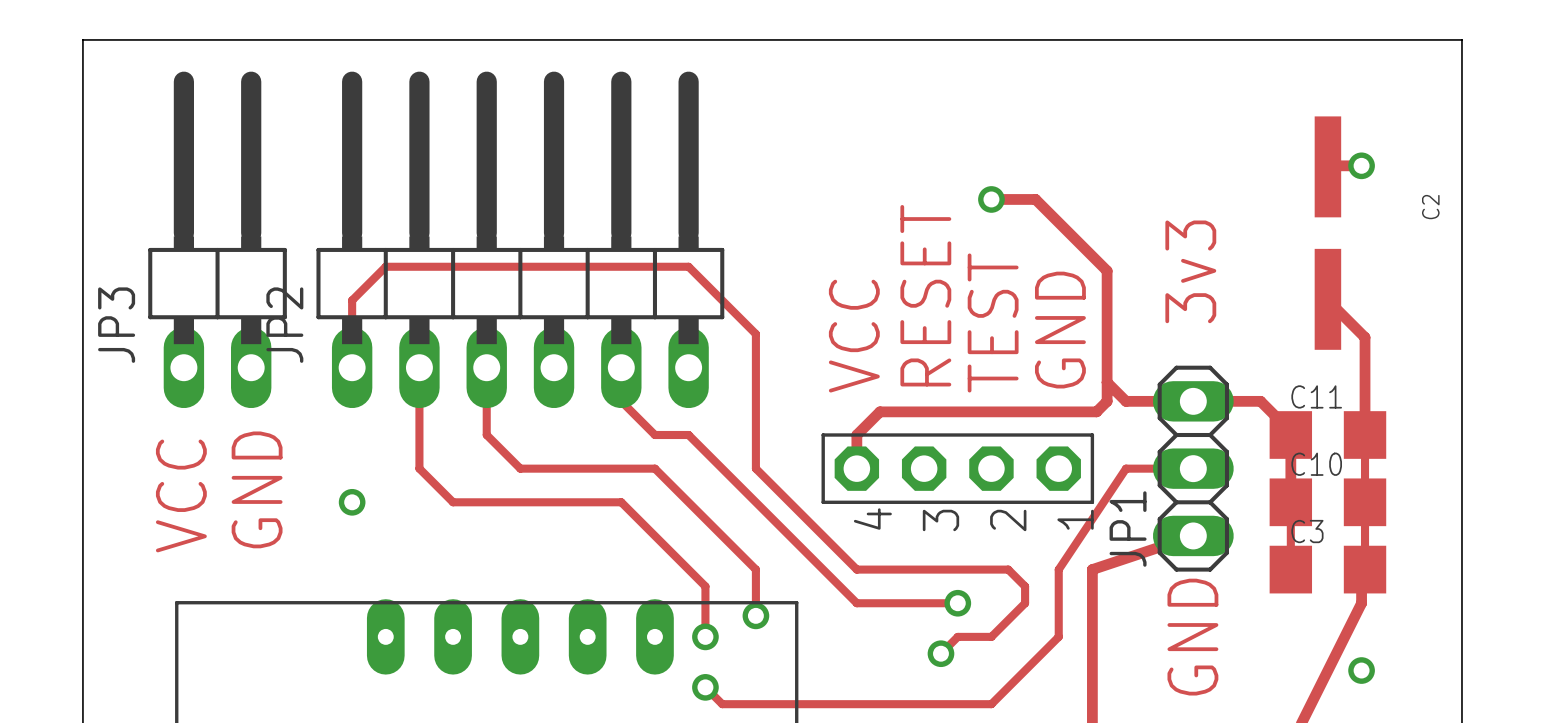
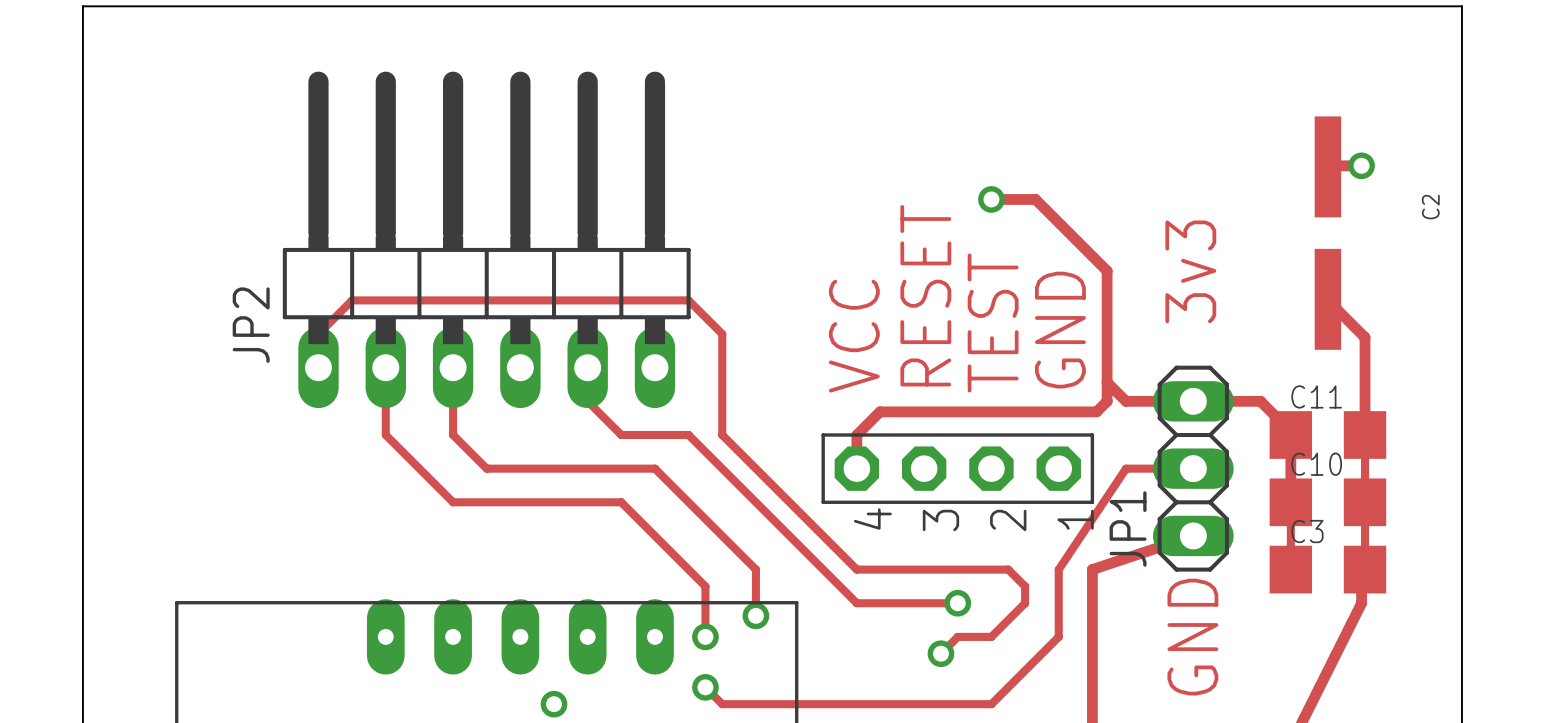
board edge: (82, 39) (1461, 39) -> (82, 39) (82, 6) (1461, 6) (1461, 39)
JP3: (217, 239) -> none
JP2 position: (520, 239) -> (486, 239)
track: (352, 367) (352, 300) (385, 266) (688, 266) (755, 334) (755, 468) -> (318, 367) (318, 334) (352, 300) (688, 300) (722, 334) (722, 435) (755, 468)
track: (419, 367) (419, 468) -> (385, 367) (385, 435) (419, 468)
track: (486, 367) (486, 435) (520, 468) -> (453, 367) (453, 435) (486, 468) (520, 468)
track: (621, 367) (621, 401) (654, 435) -> (587, 367) (587, 401) (621, 435) (654, 435)
text: GND (257, 489) -> none
text: VCC (181, 495) -> none
via: (352, 502) -> none
via: (1361, 670) -> none
via: none -> (554, 704)

